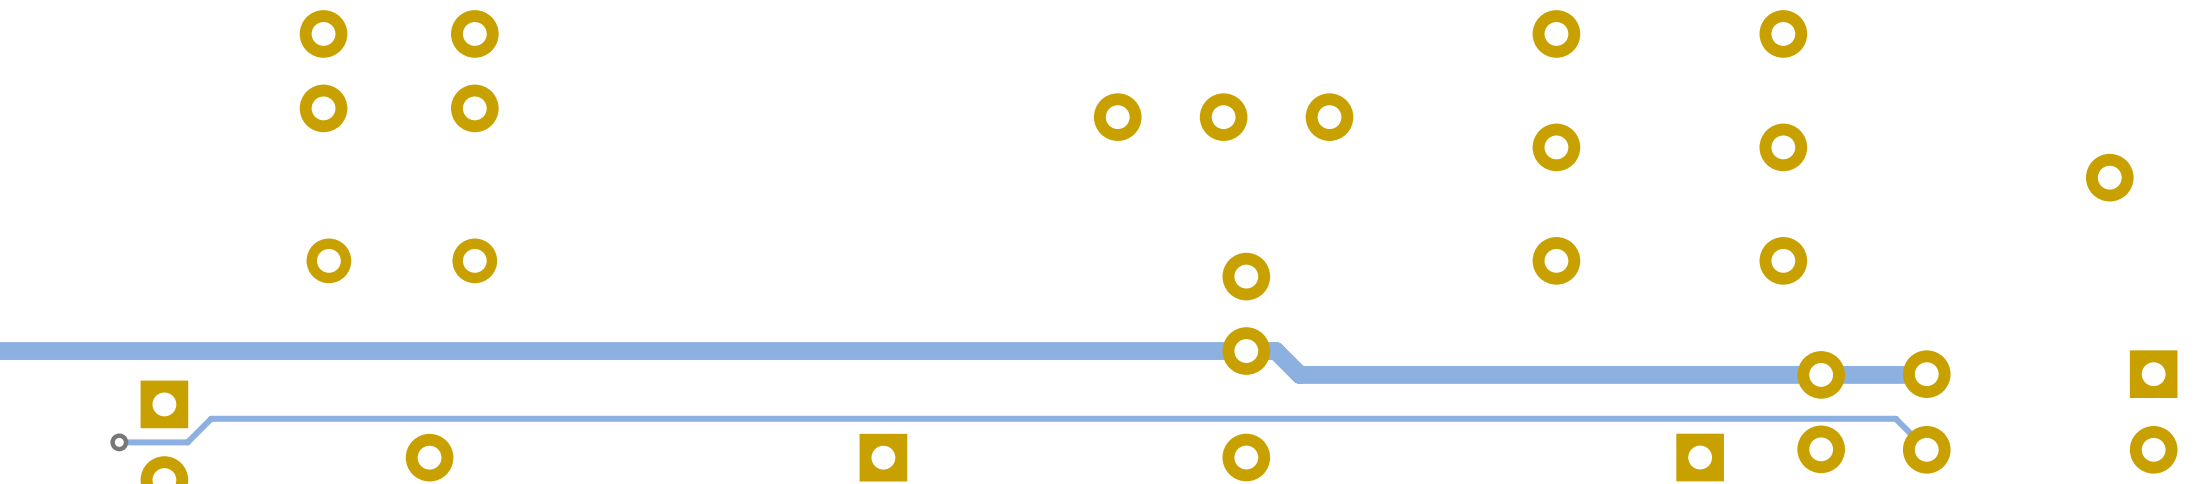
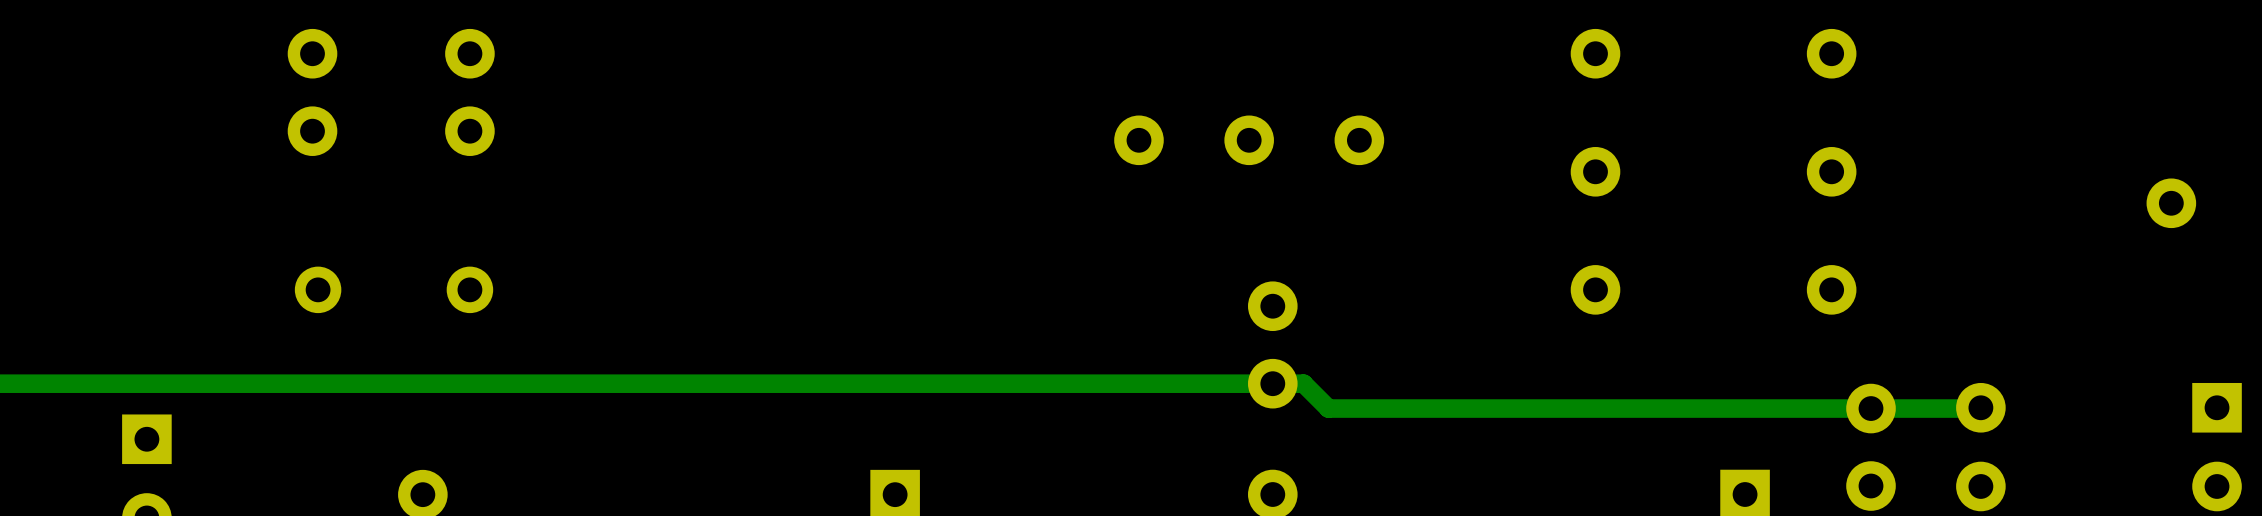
track: (119, 442) (187, 442) (211, 418) (1895, 418) (1926, 449) -> none
via: (119, 442) -> none

